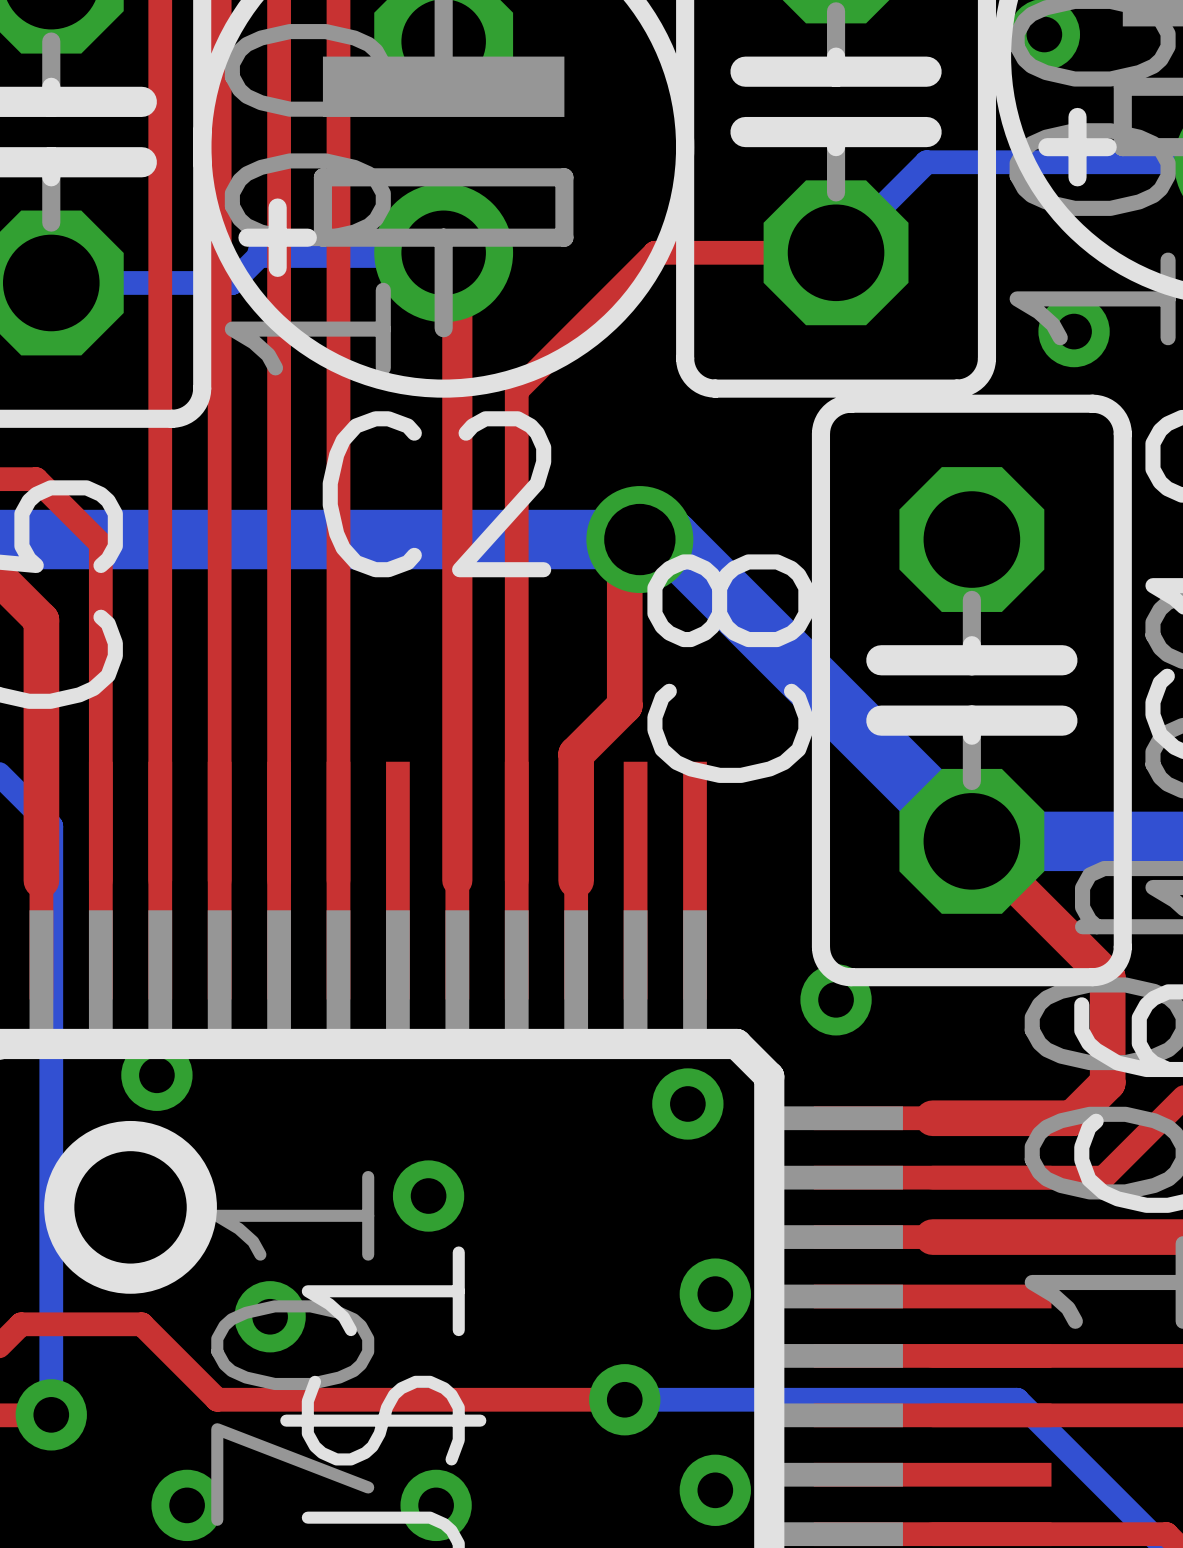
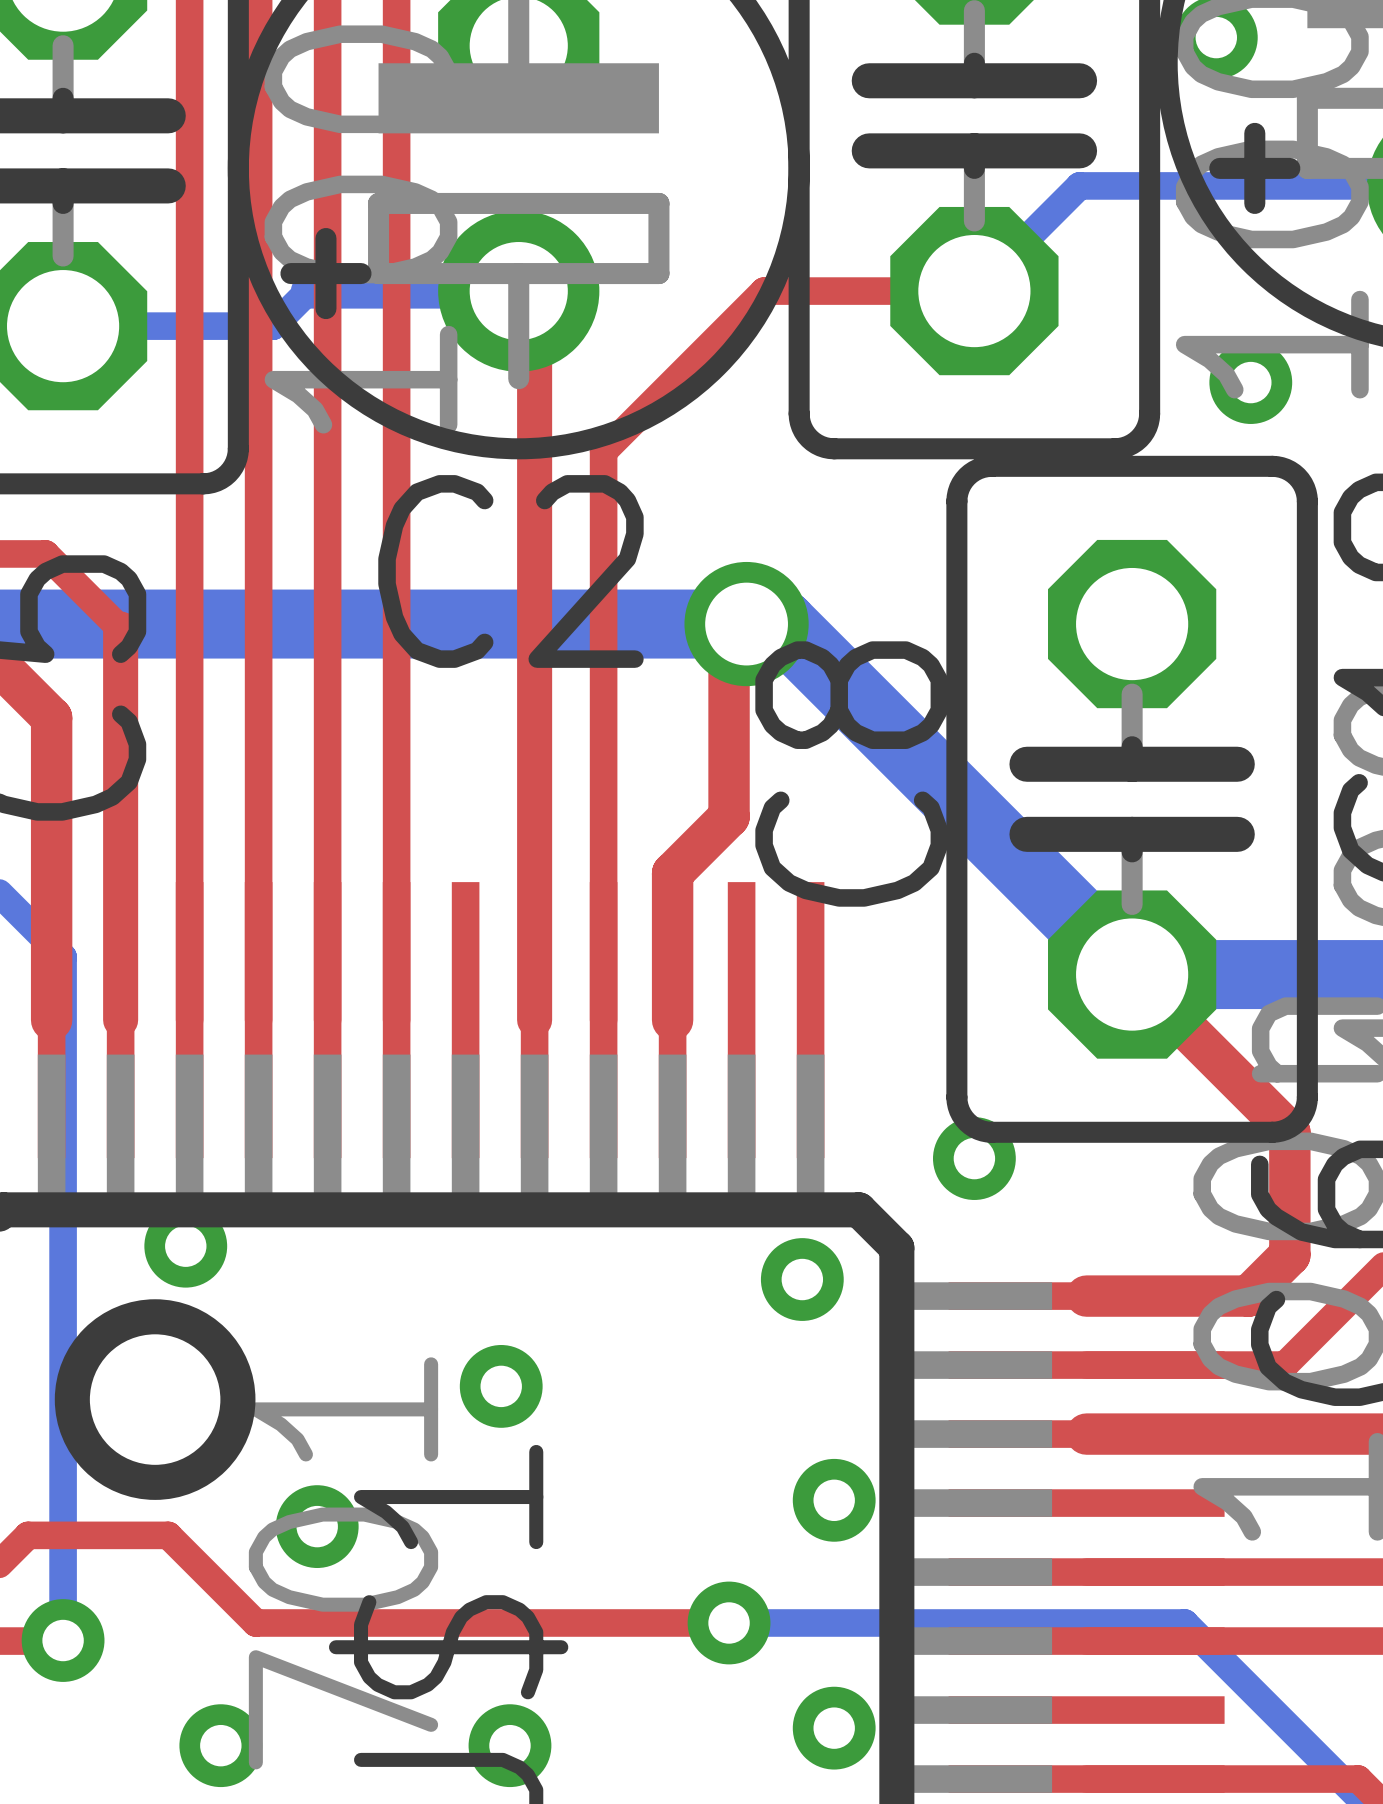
top track width: thin (100, 543) (100, 880) -> thick (120, 629) (120, 1020)

